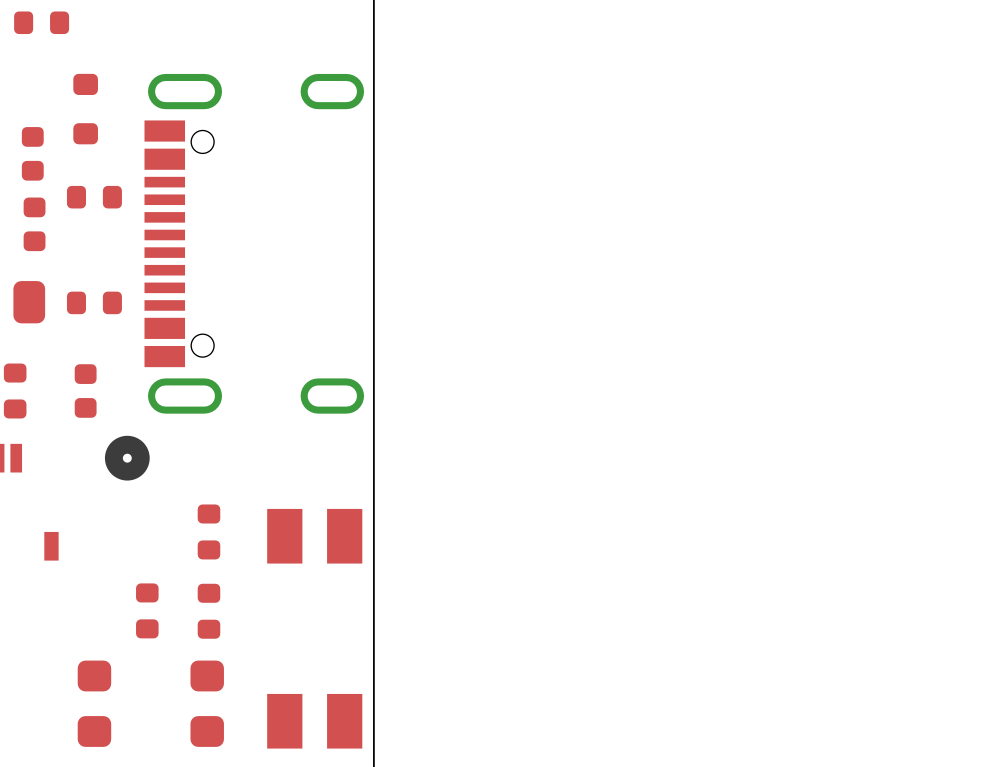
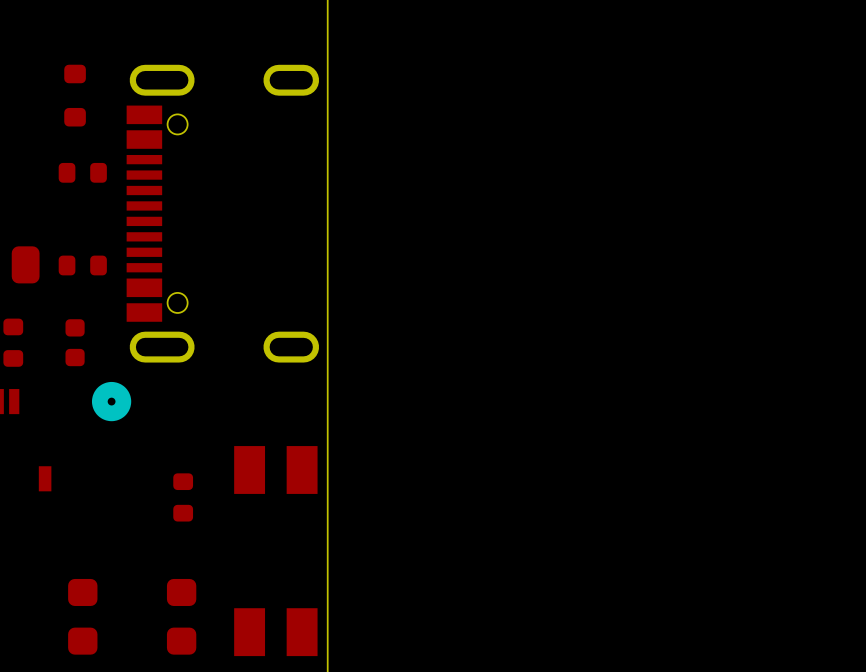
part: (41, 22) -> none
part: (32, 153) -> none
part: (34, 224) -> none
part: (208, 531) -> none
part: none -> (183, 497)
part: (147, 610) -> none
part: (208, 611) -> none

